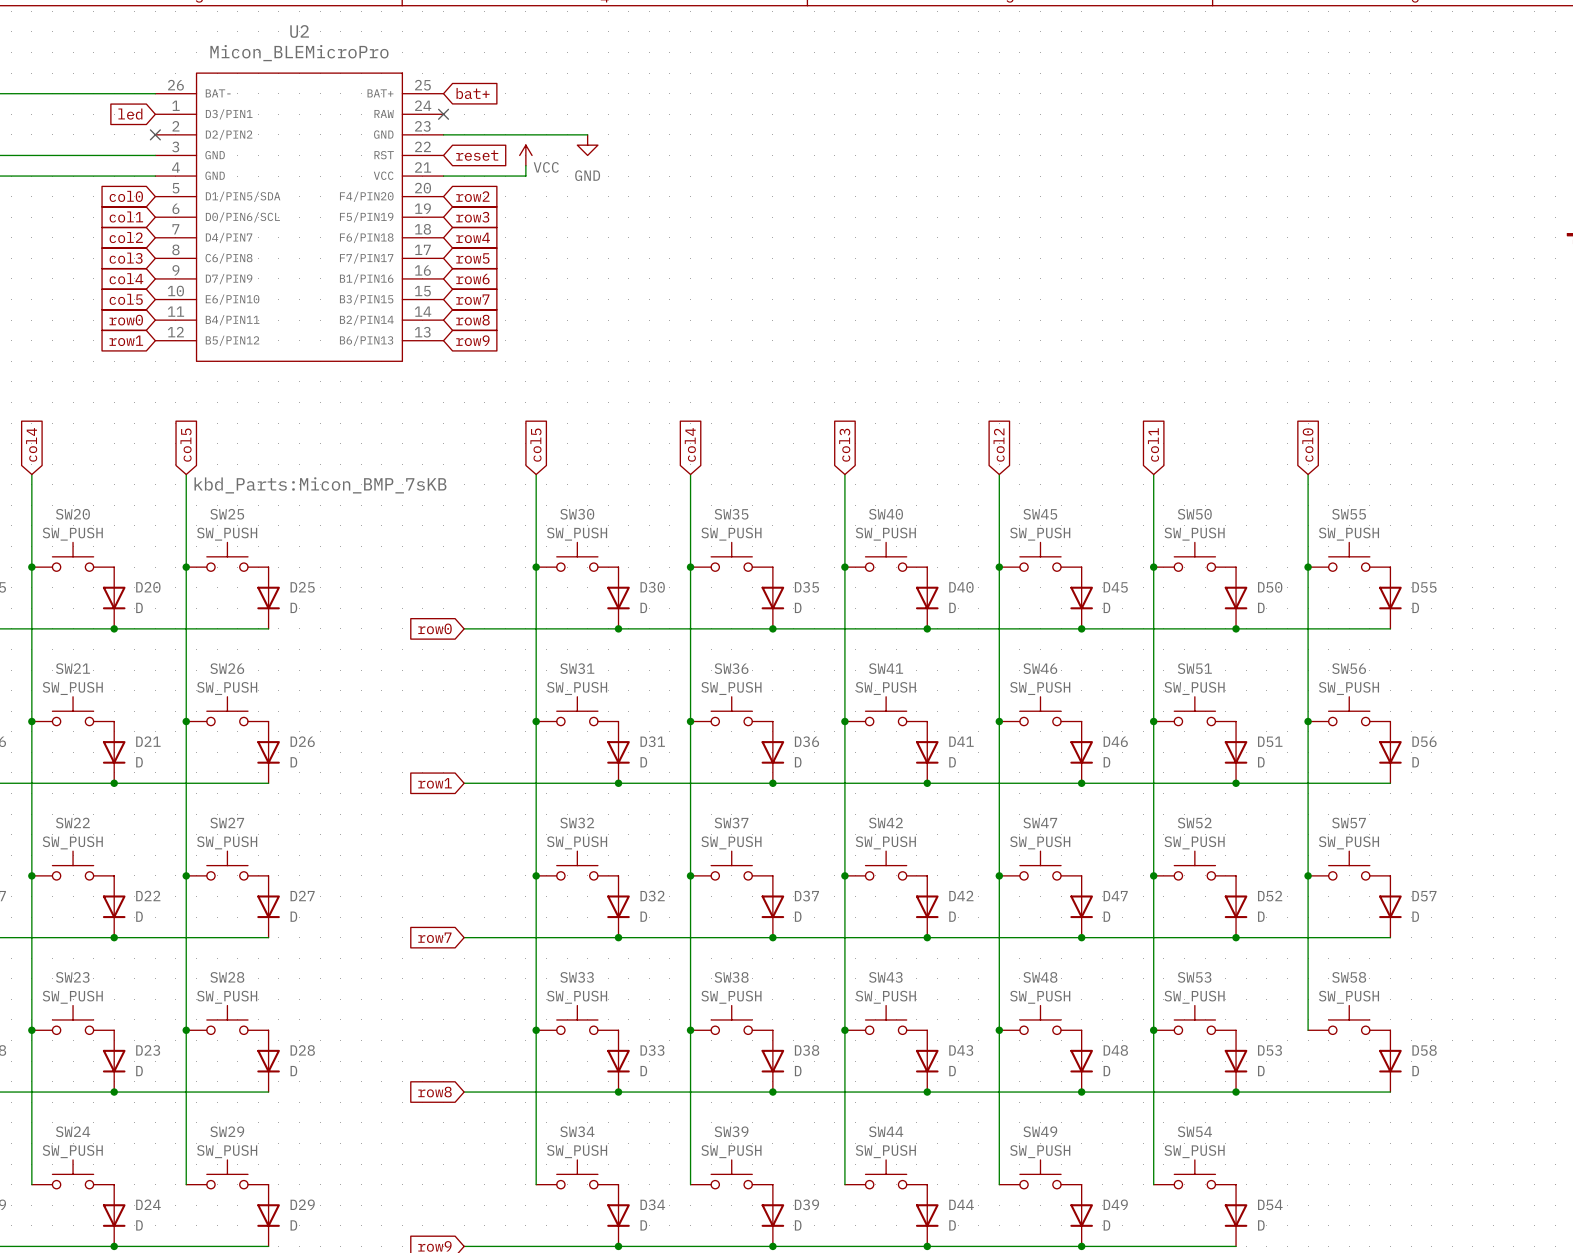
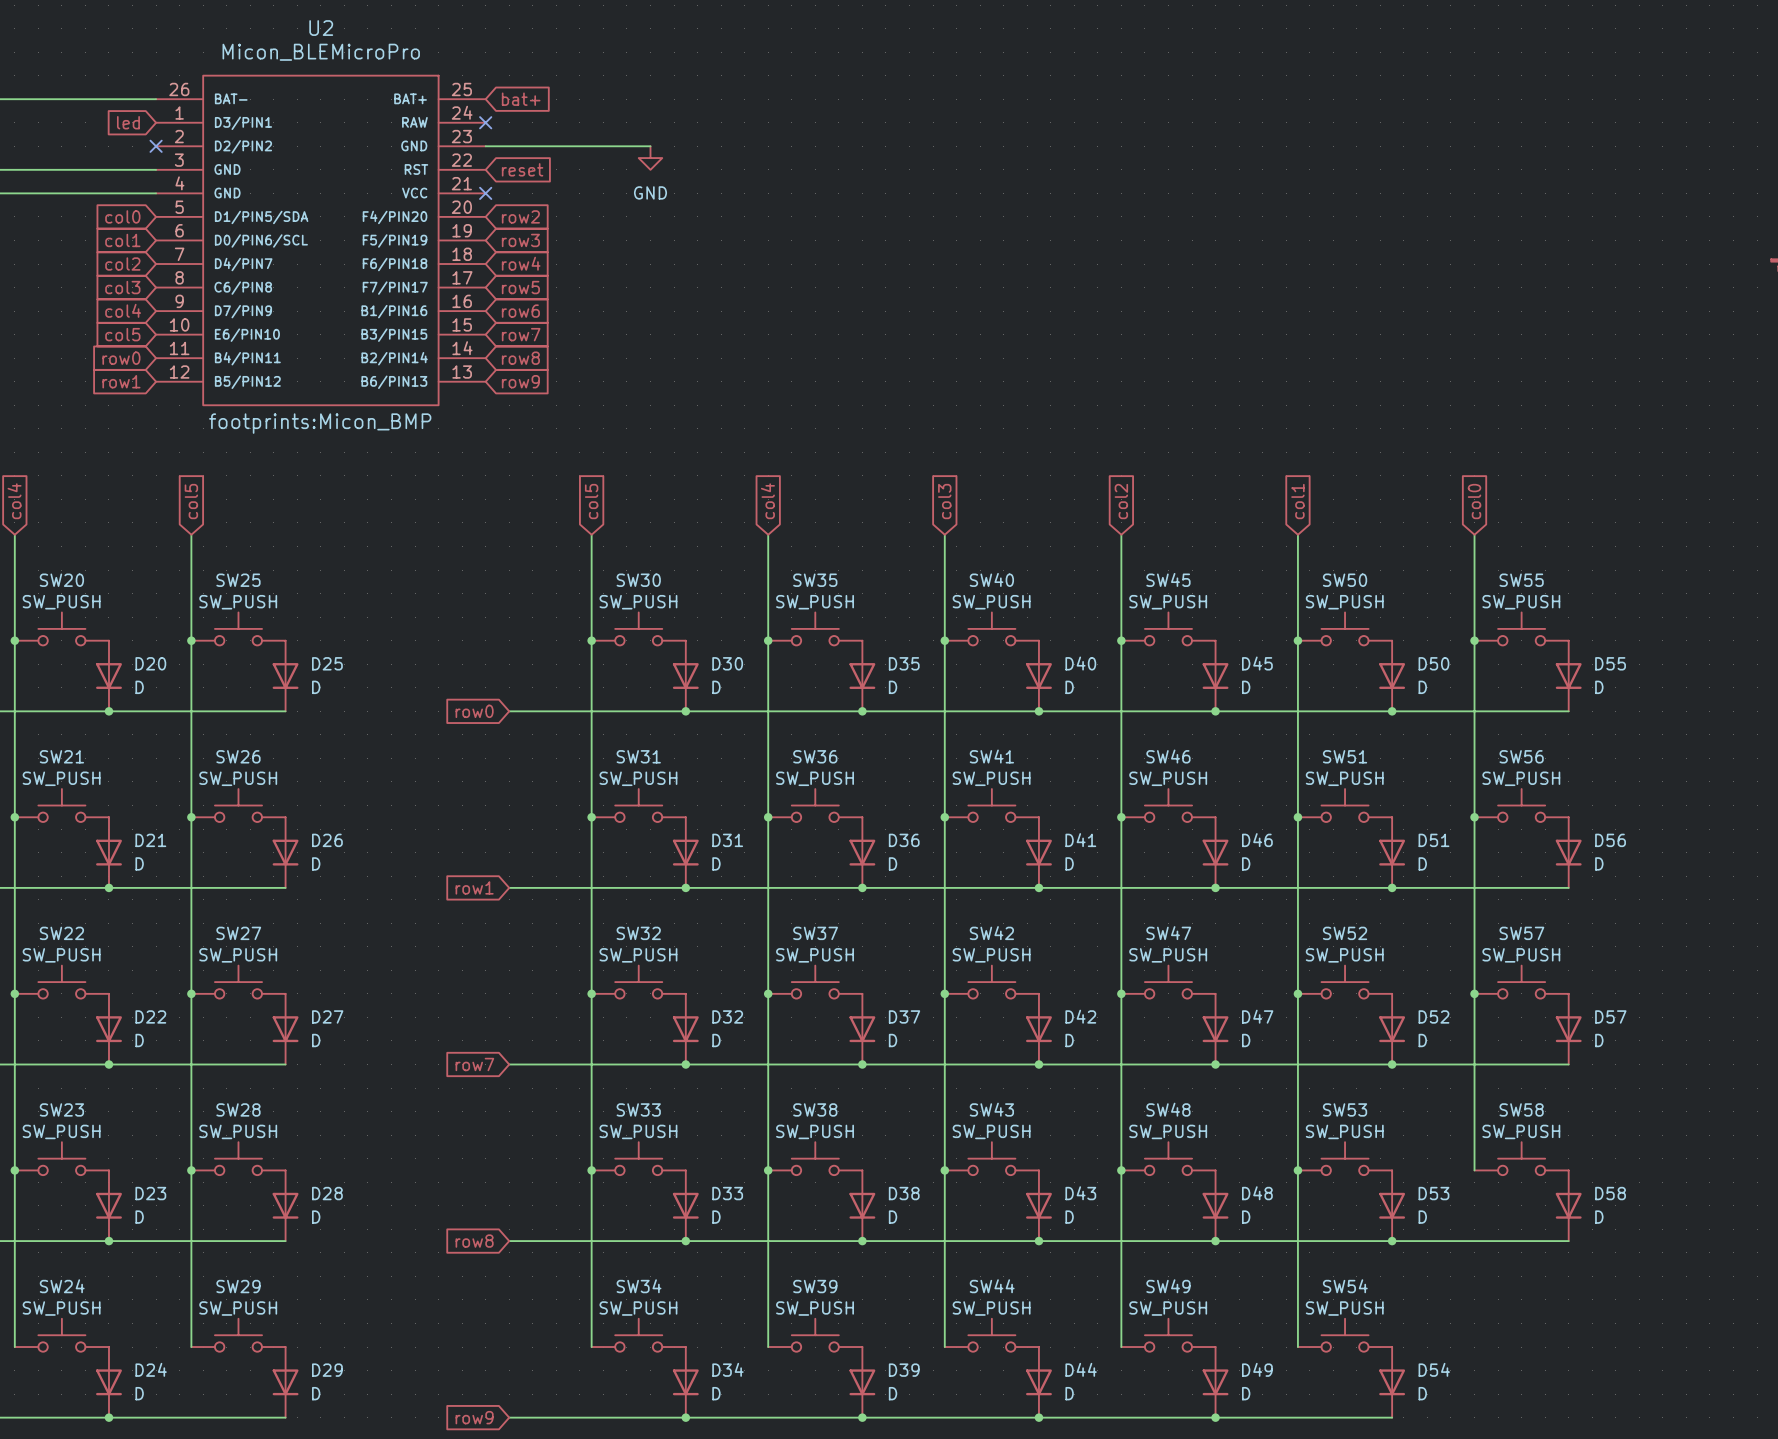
power symbol: VCC (525, 155) -> none
wire: (525, 165) (525, 176) (443, 176) -> none
no-connect mark: none -> (485, 193)
U2 text: kbd_Parts:Micon_BMP_7sKB (320, 485) -> footprints:Micon_BMP (320, 423)

